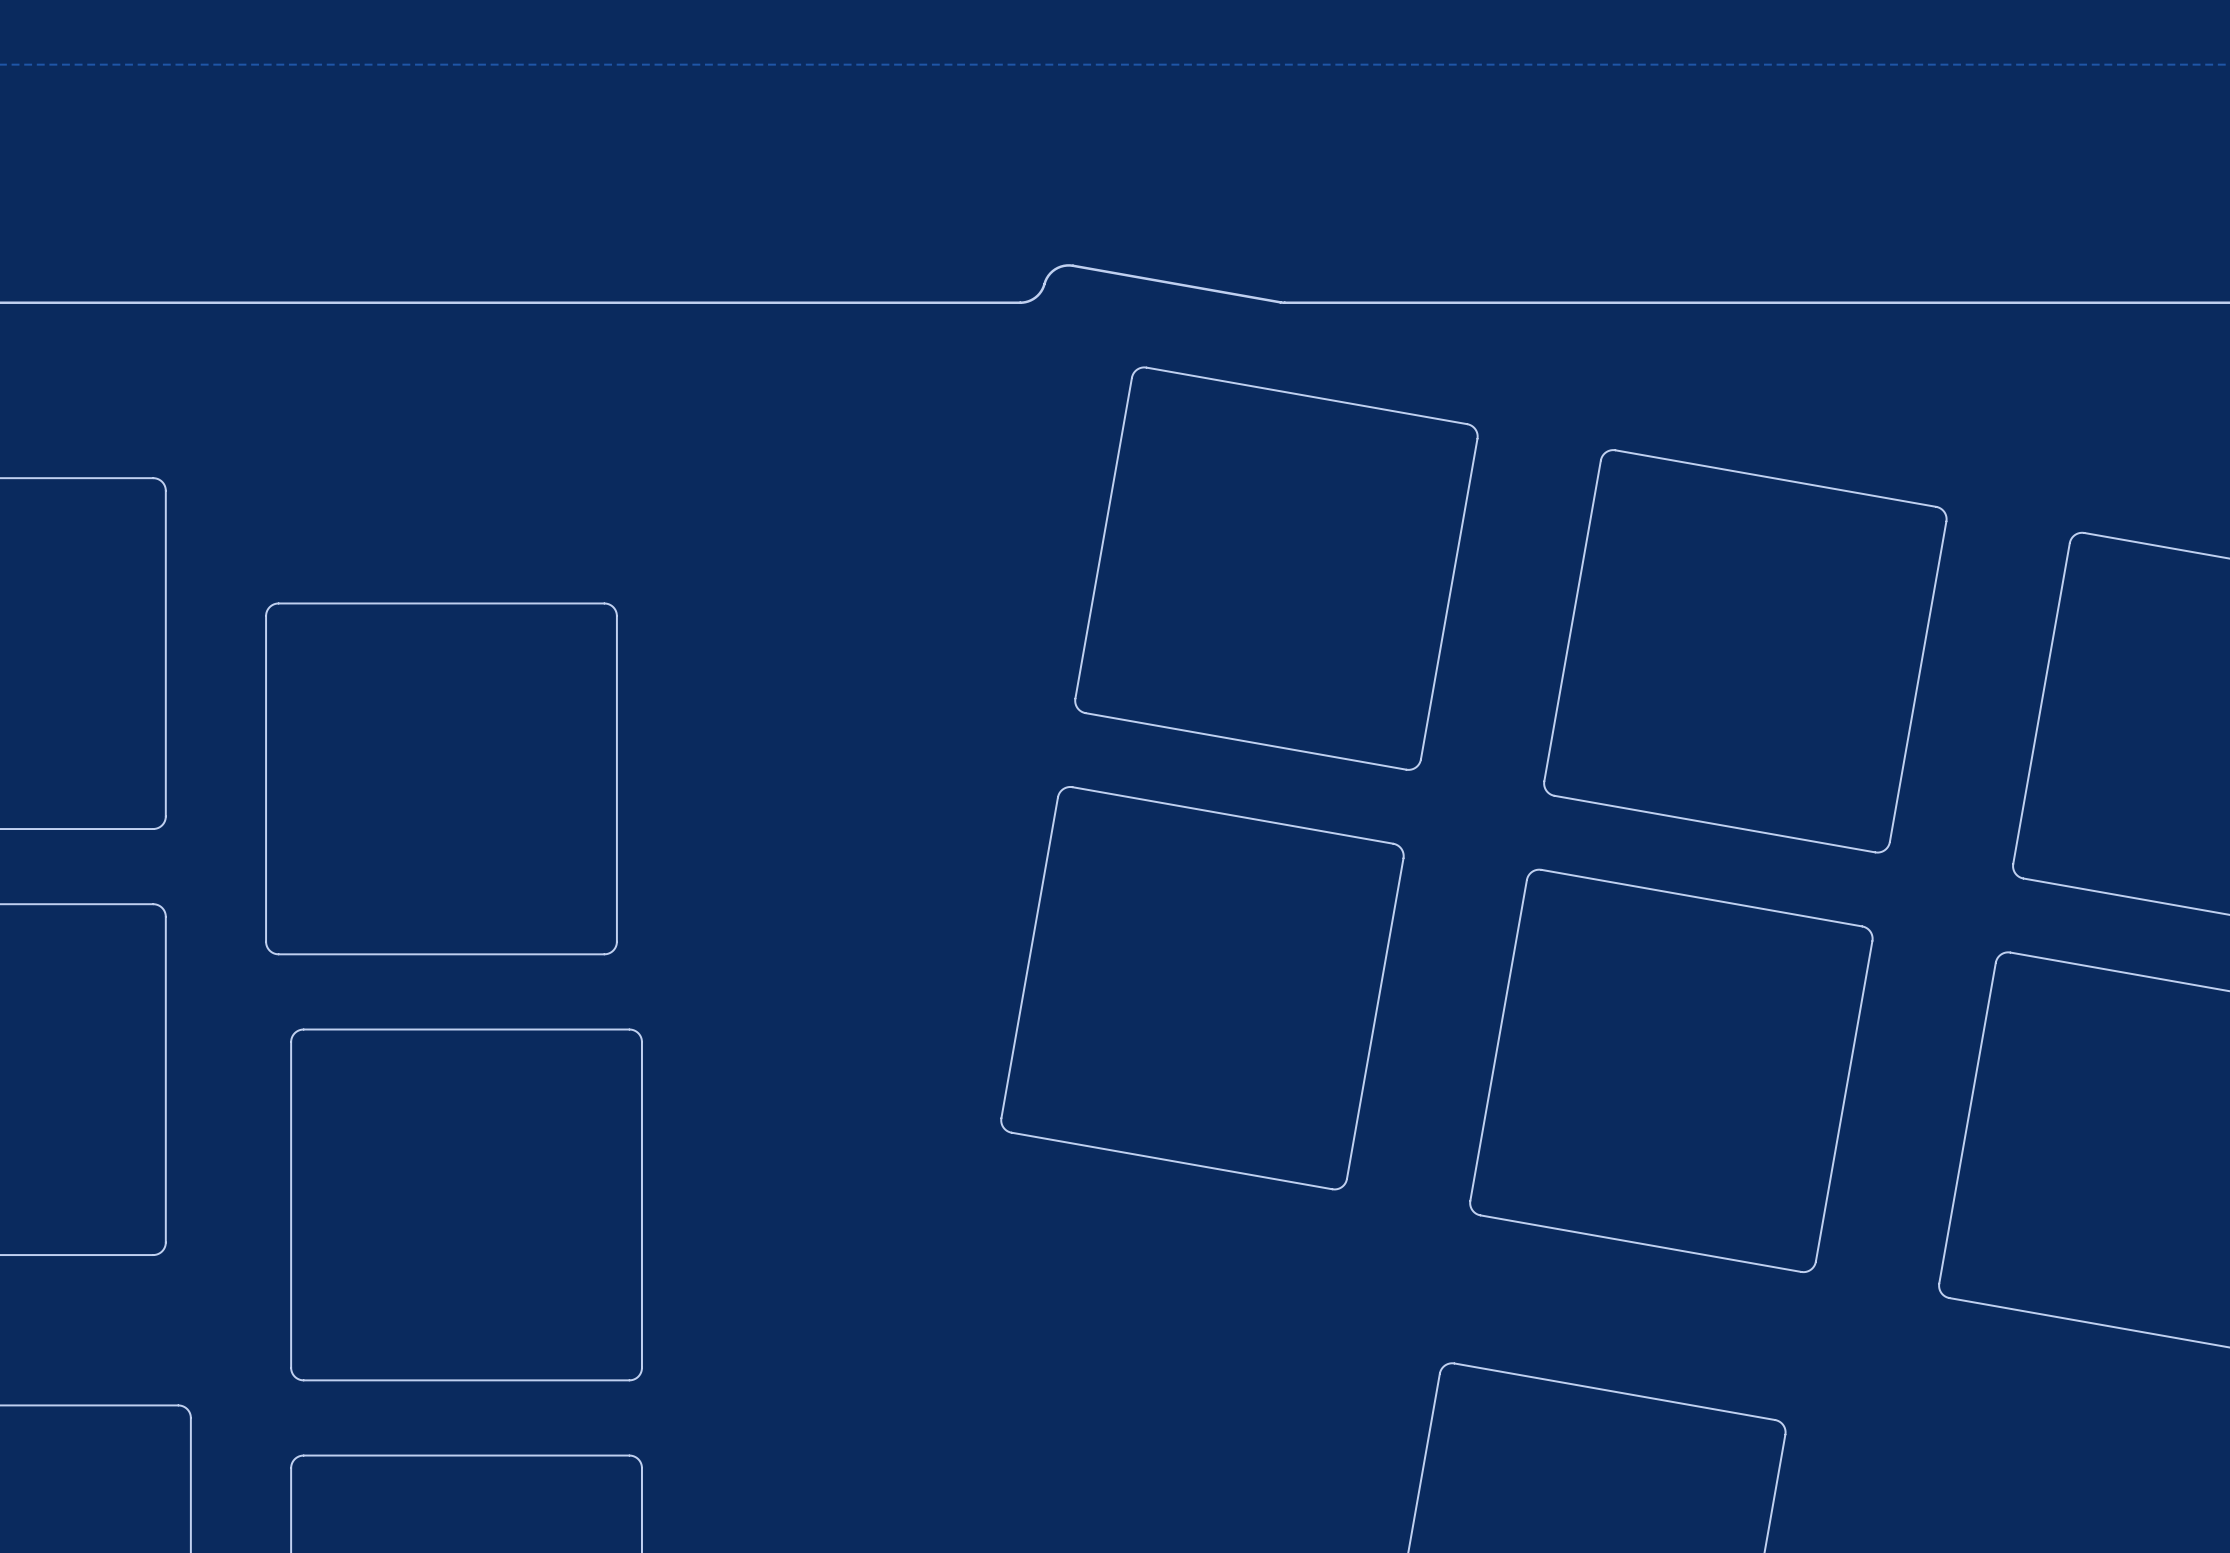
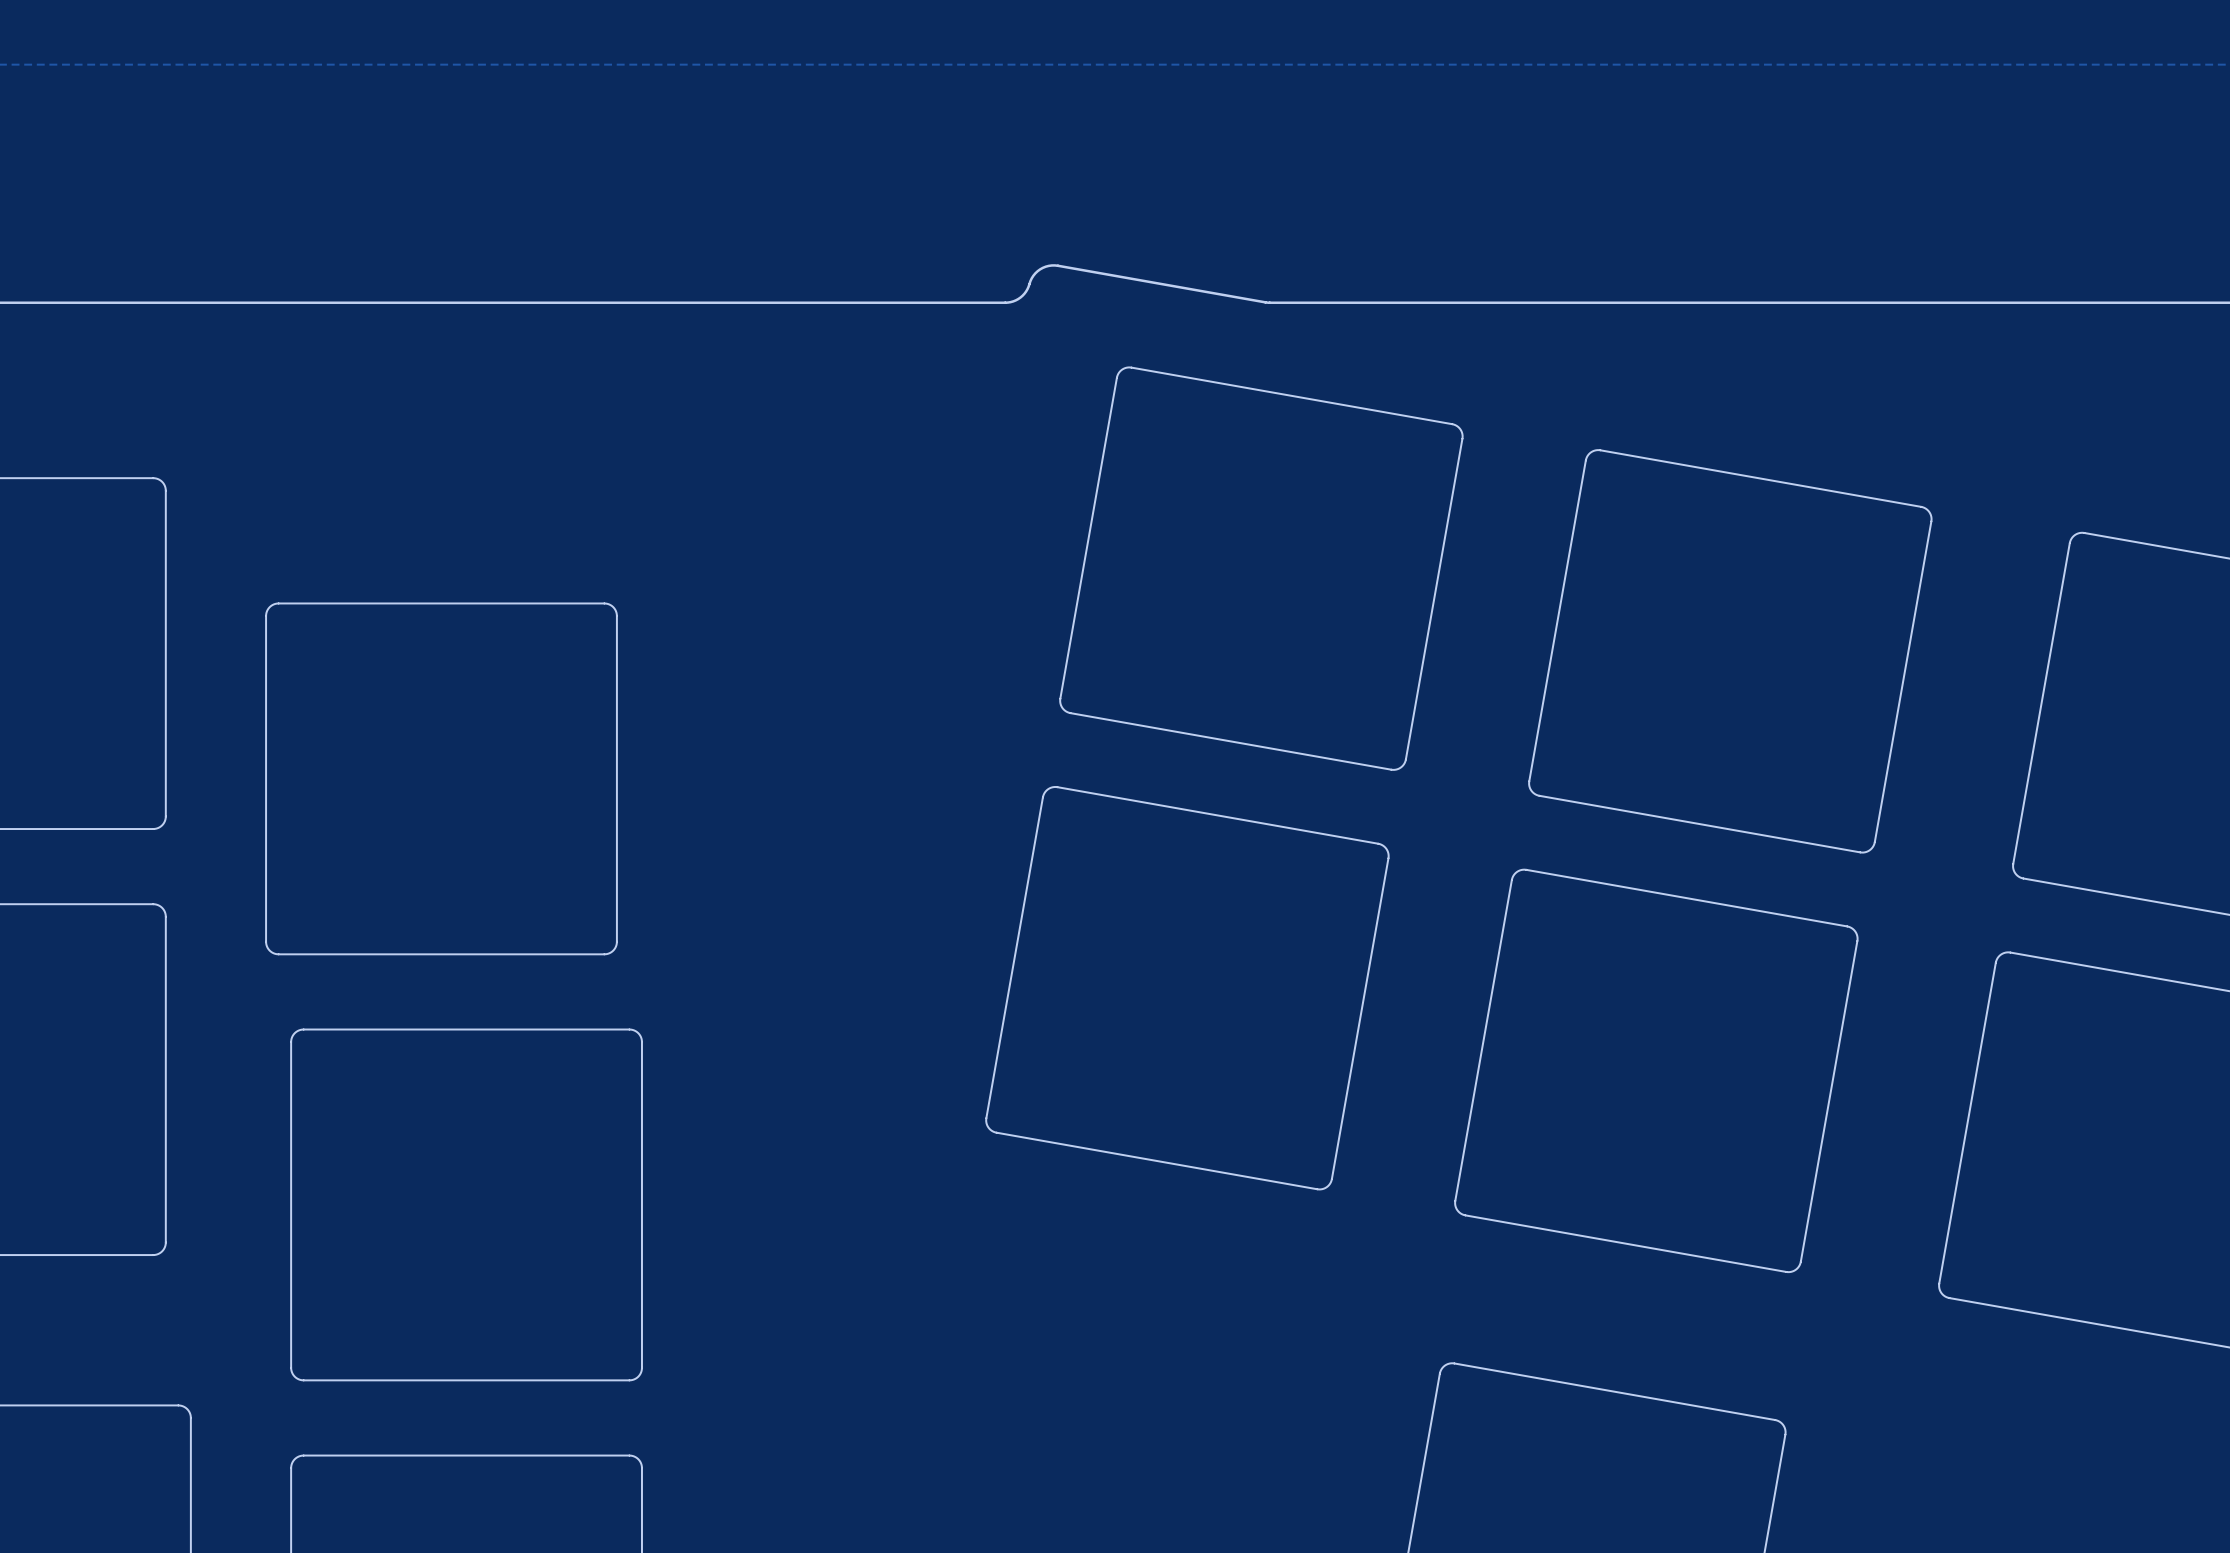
board edge: (1005, 302) (1022, 302) (1033, 299) (1041, 291) (1046, 278) (1052, 271) (1060, 266) (1069, 265) (1284, 302) -> (1005, 302) (1013, 301) (1022, 295) (1037, 271) (1045, 266) (1054, 265) (1265, 302) (1284, 302)
drawing position: (1276, 568) -> (1261, 568)
drawing position: (1745, 651) -> (1730, 651)
drawing position: (1202, 988) -> (1187, 988)
drawing position: (1671, 1070) -> (1656, 1070)

